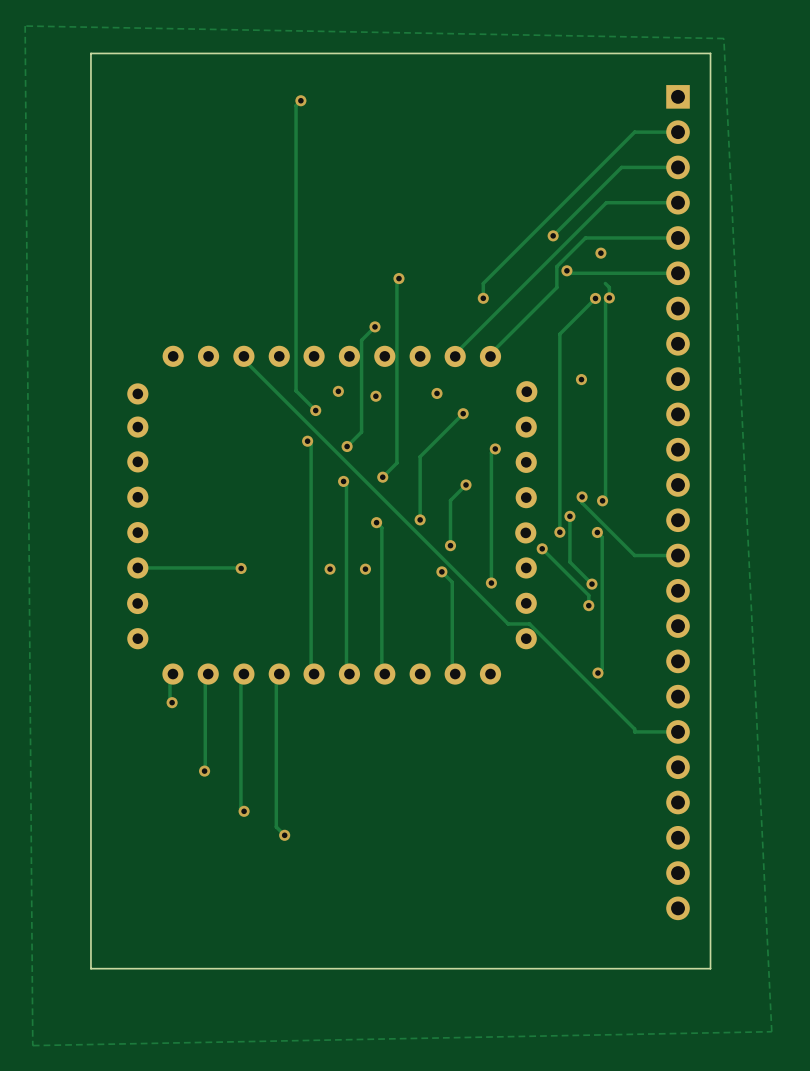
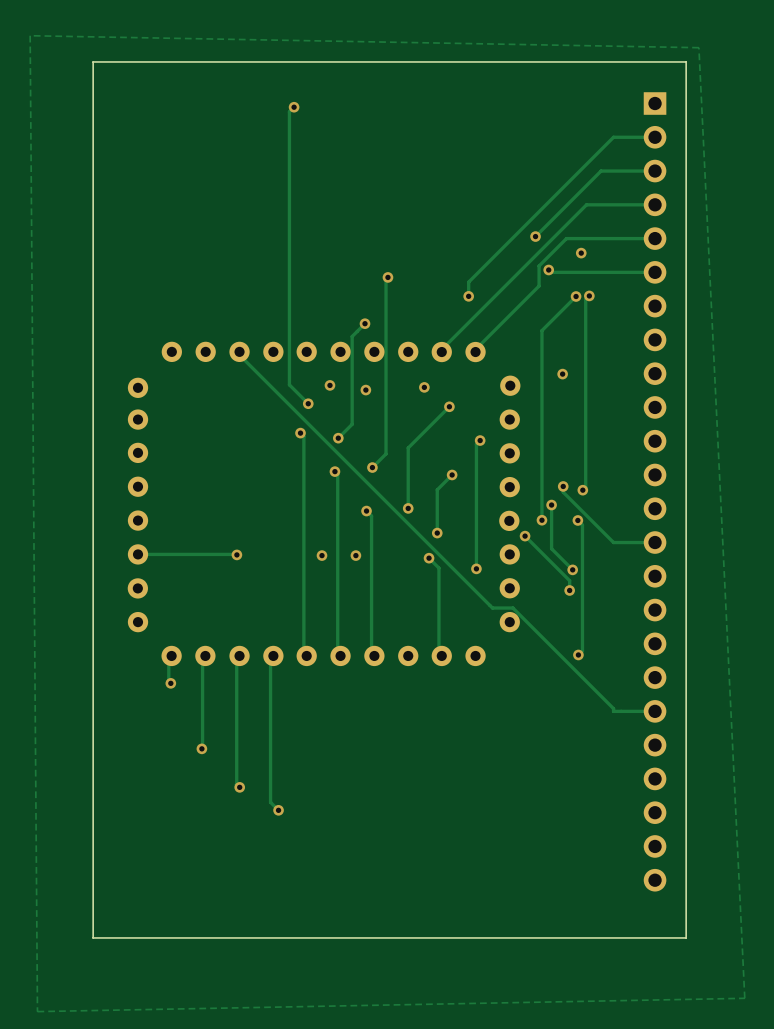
track: (605, 283) (609, 287) (609, 297) -> none

